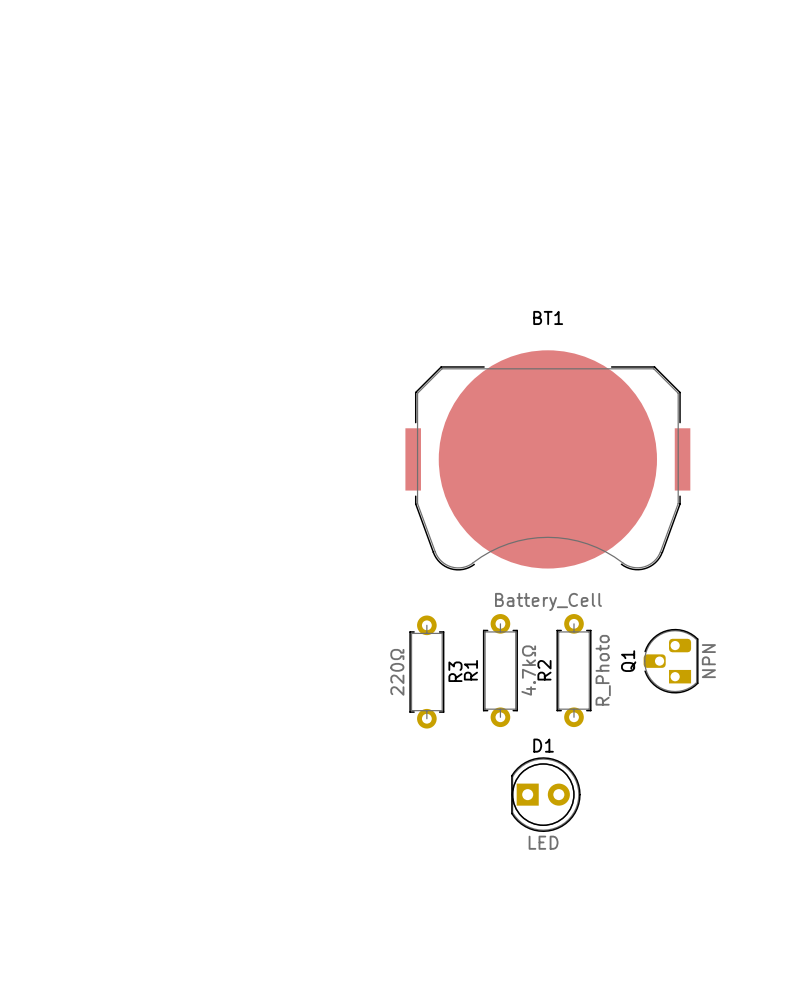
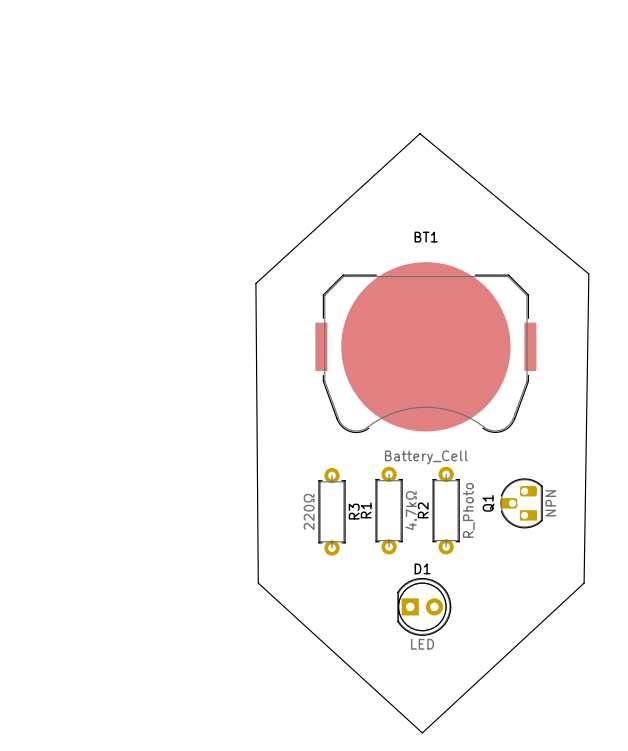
board edge: none -> (420, 133) (588, 273) (584, 583) (422, 732) (258, 583) (255, 283) (420, 133)

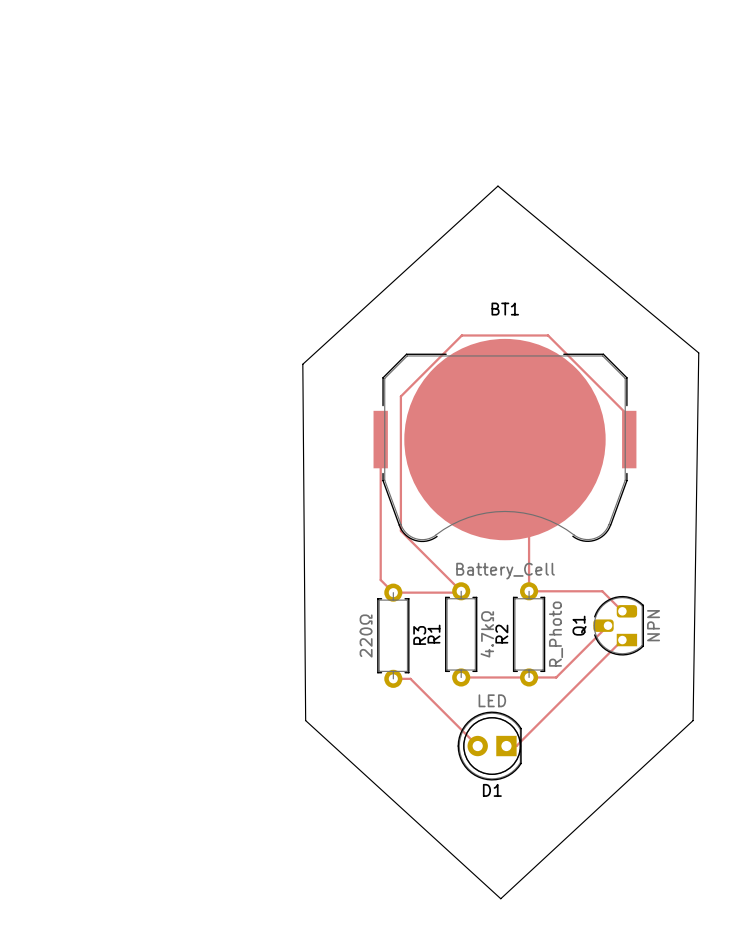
top track: none -> (380, 439) (380, 580) (393, 592) (461, 591) (400, 530) (400, 396) (461, 335) (548, 335) (629, 416) (629, 439)
top track: none -> (504, 439) (529, 463) (529, 591) (602, 591) (622, 611)
top track: none -> (608, 625) (556, 677) (461, 677)
top track: none -> (622, 640) (516, 746) (506, 746)
top track: none -> (393, 678) (410, 678) (477, 746)
D1 rotation: 0° (424, 606) -> 180° (489, 746)

